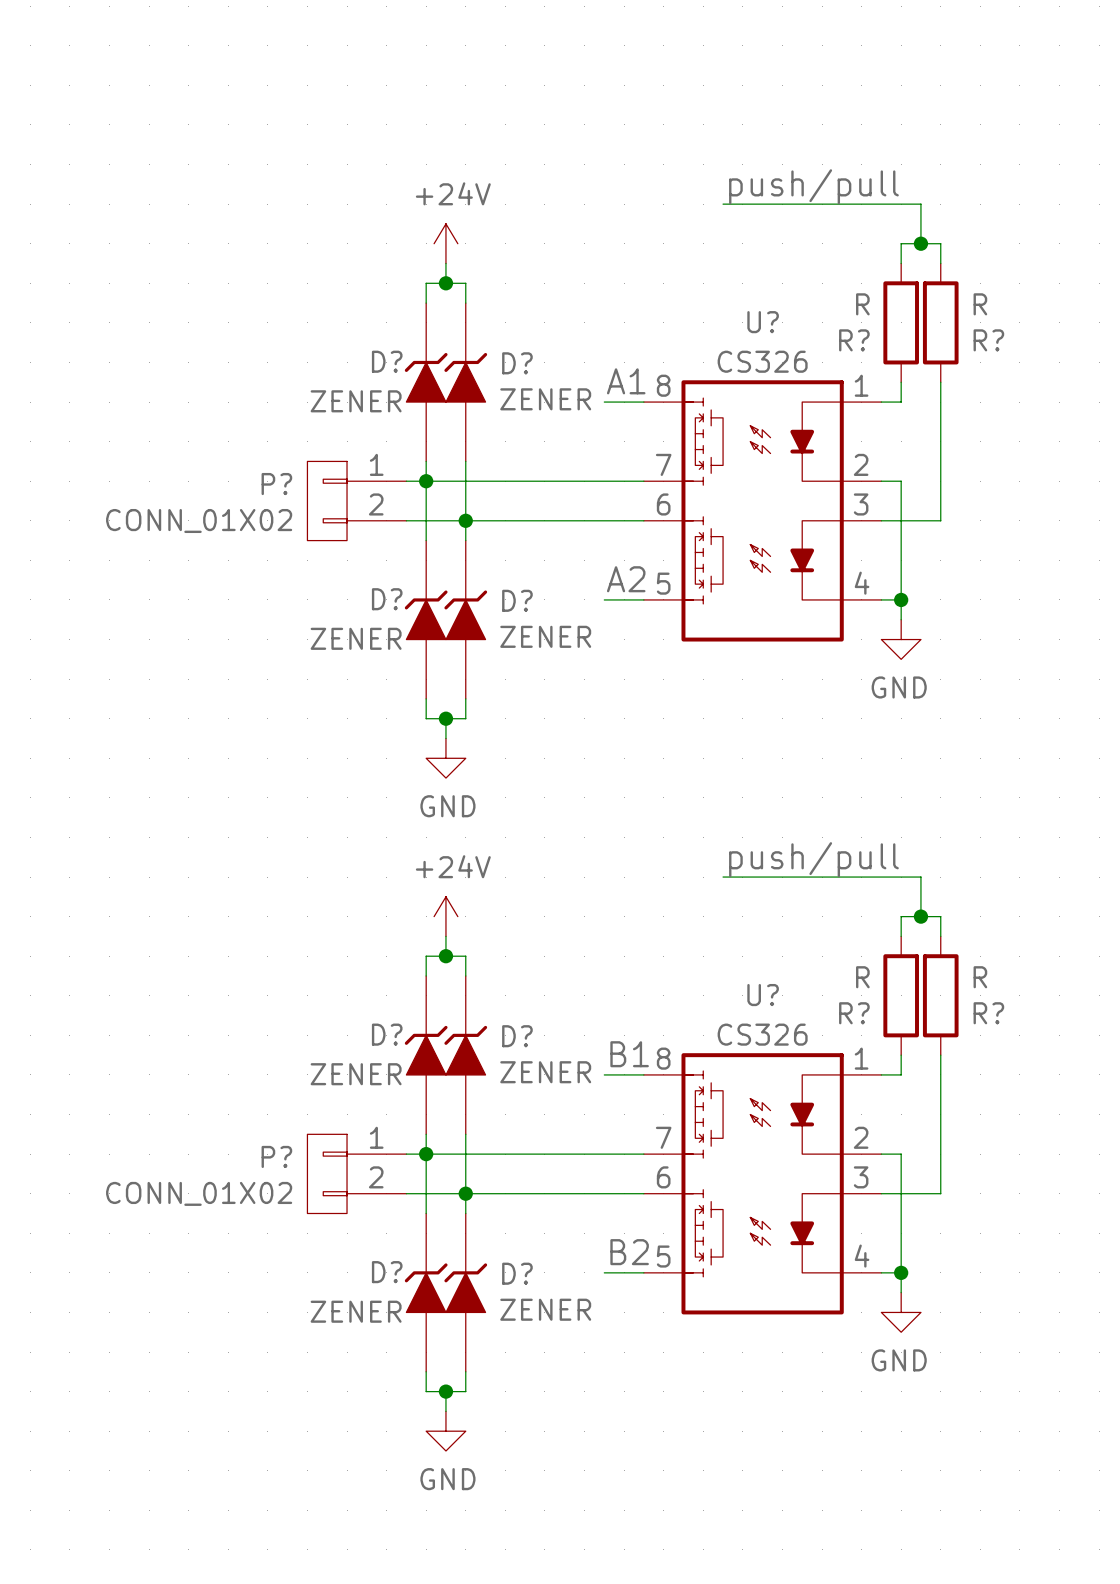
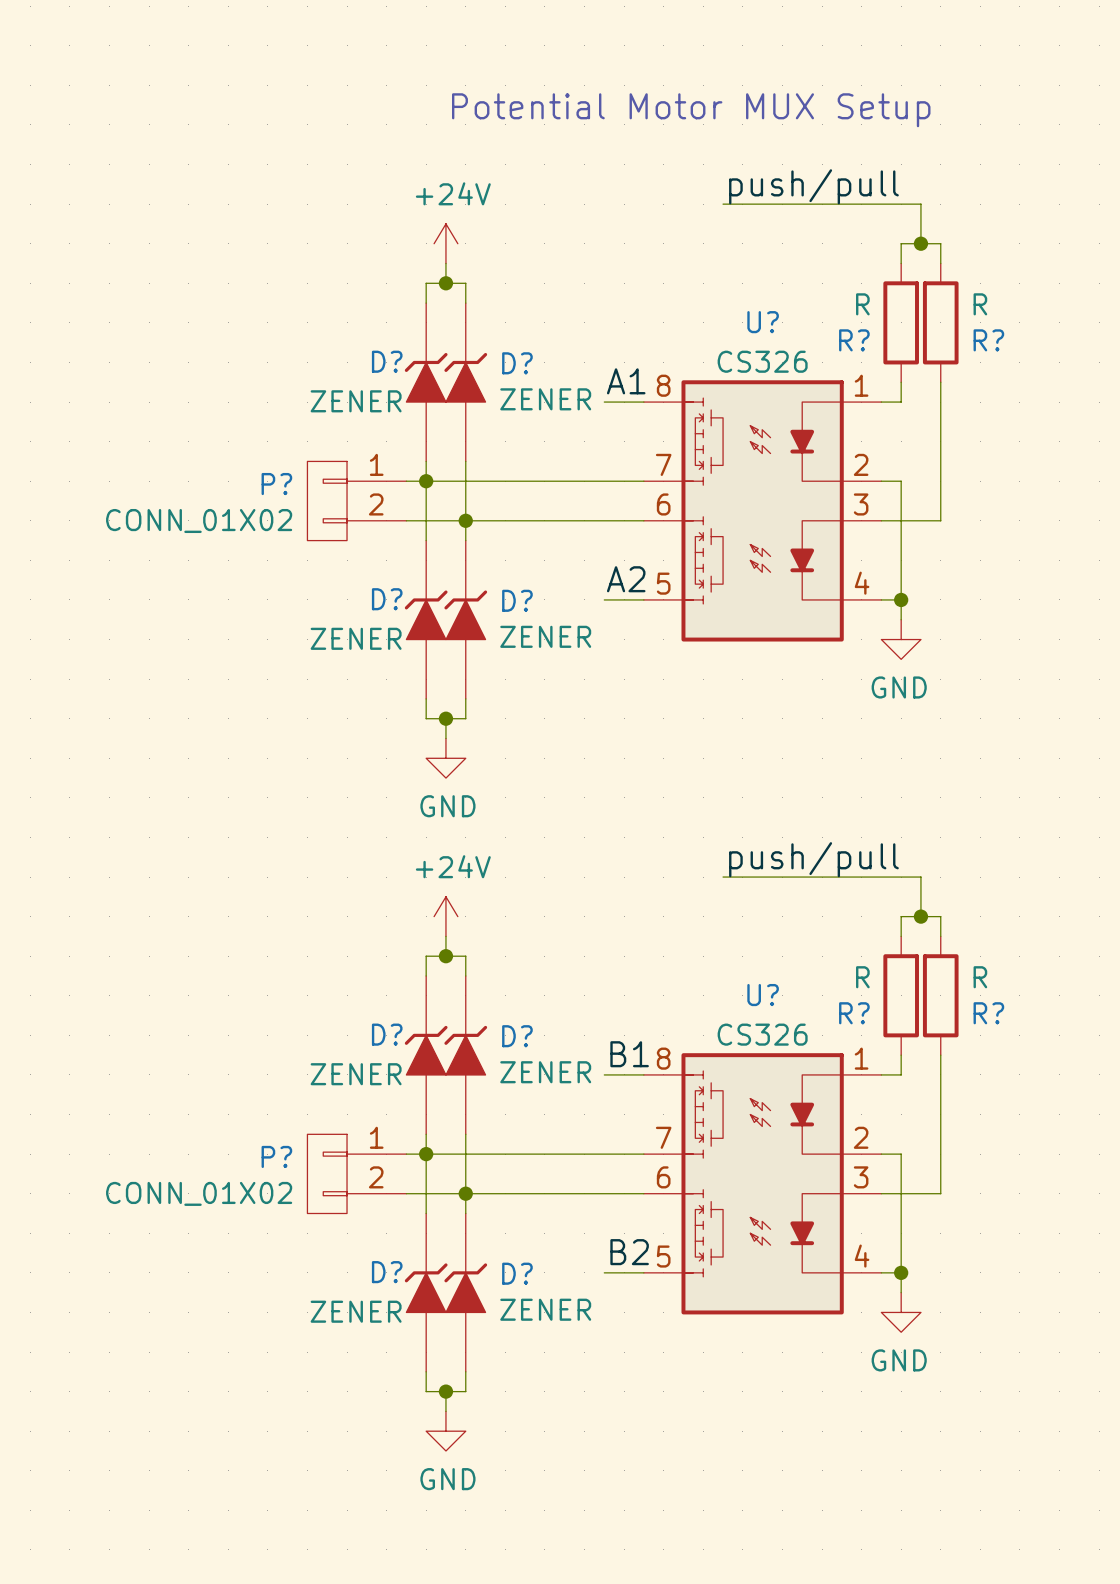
text: none -> Potential Motor MUX Setup (691, 110)

